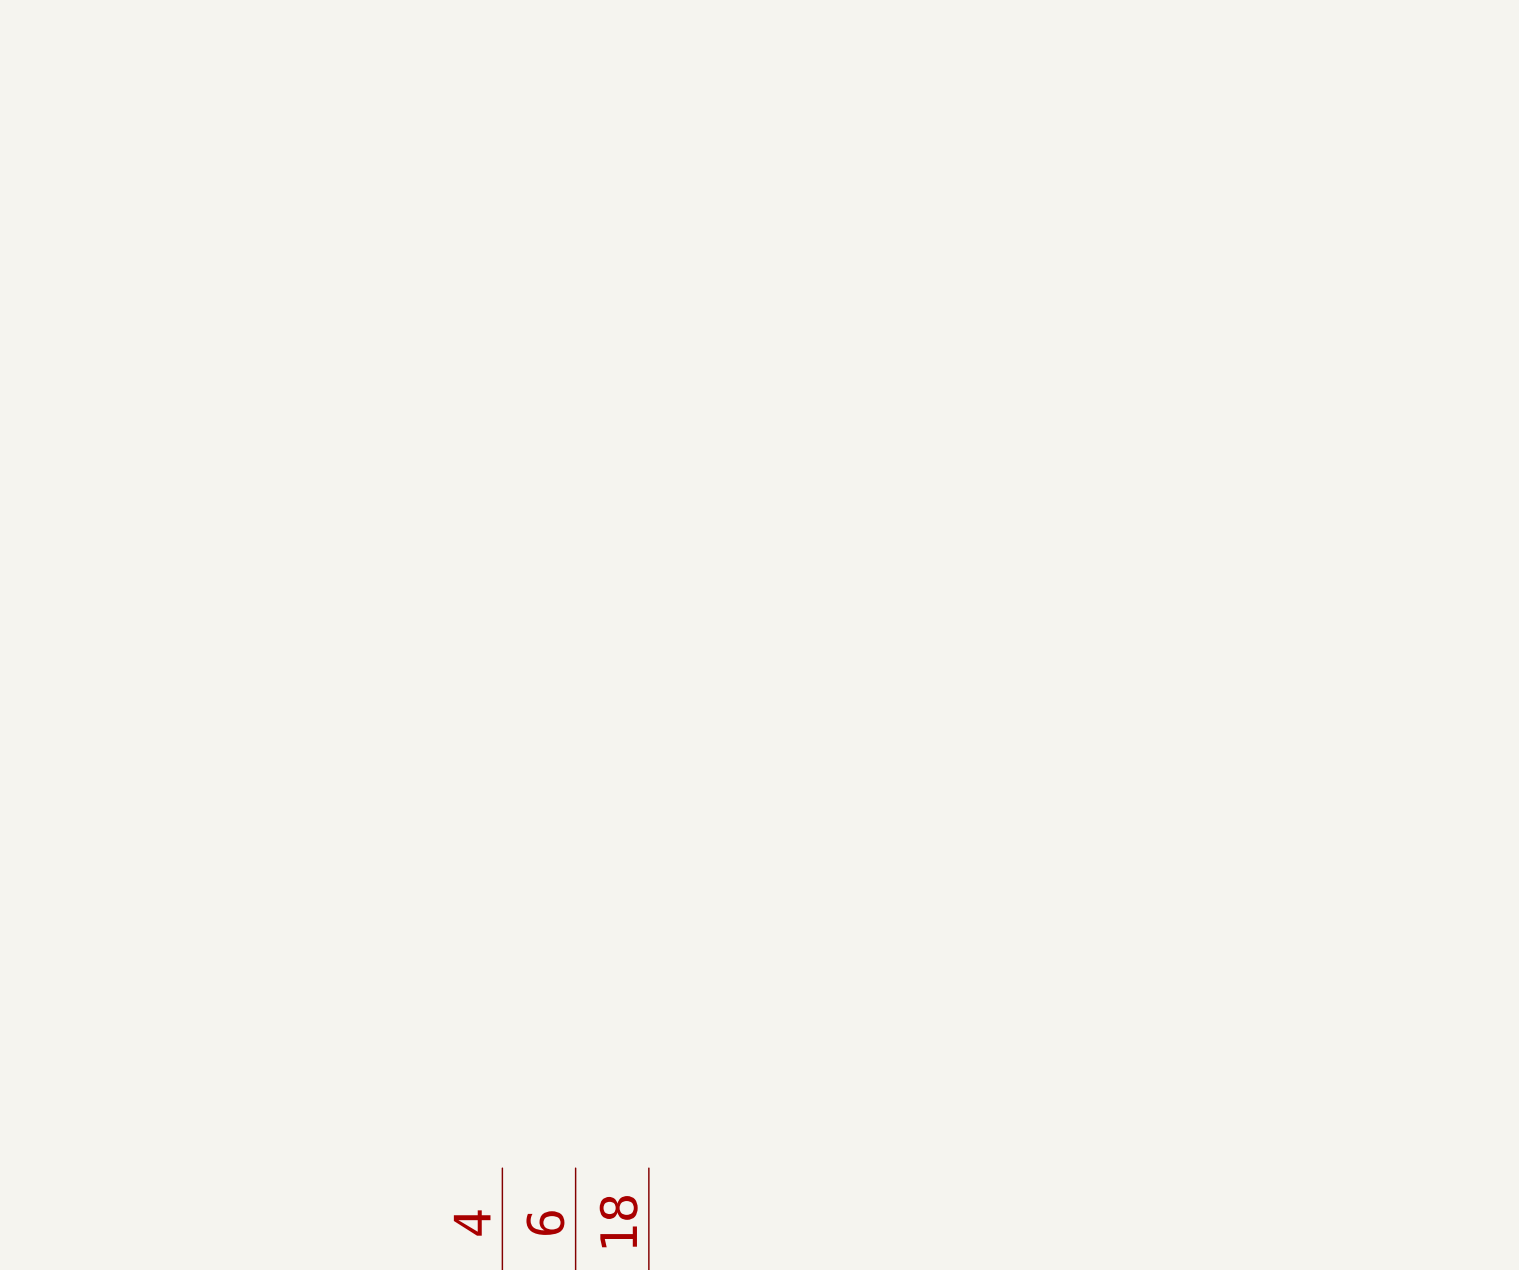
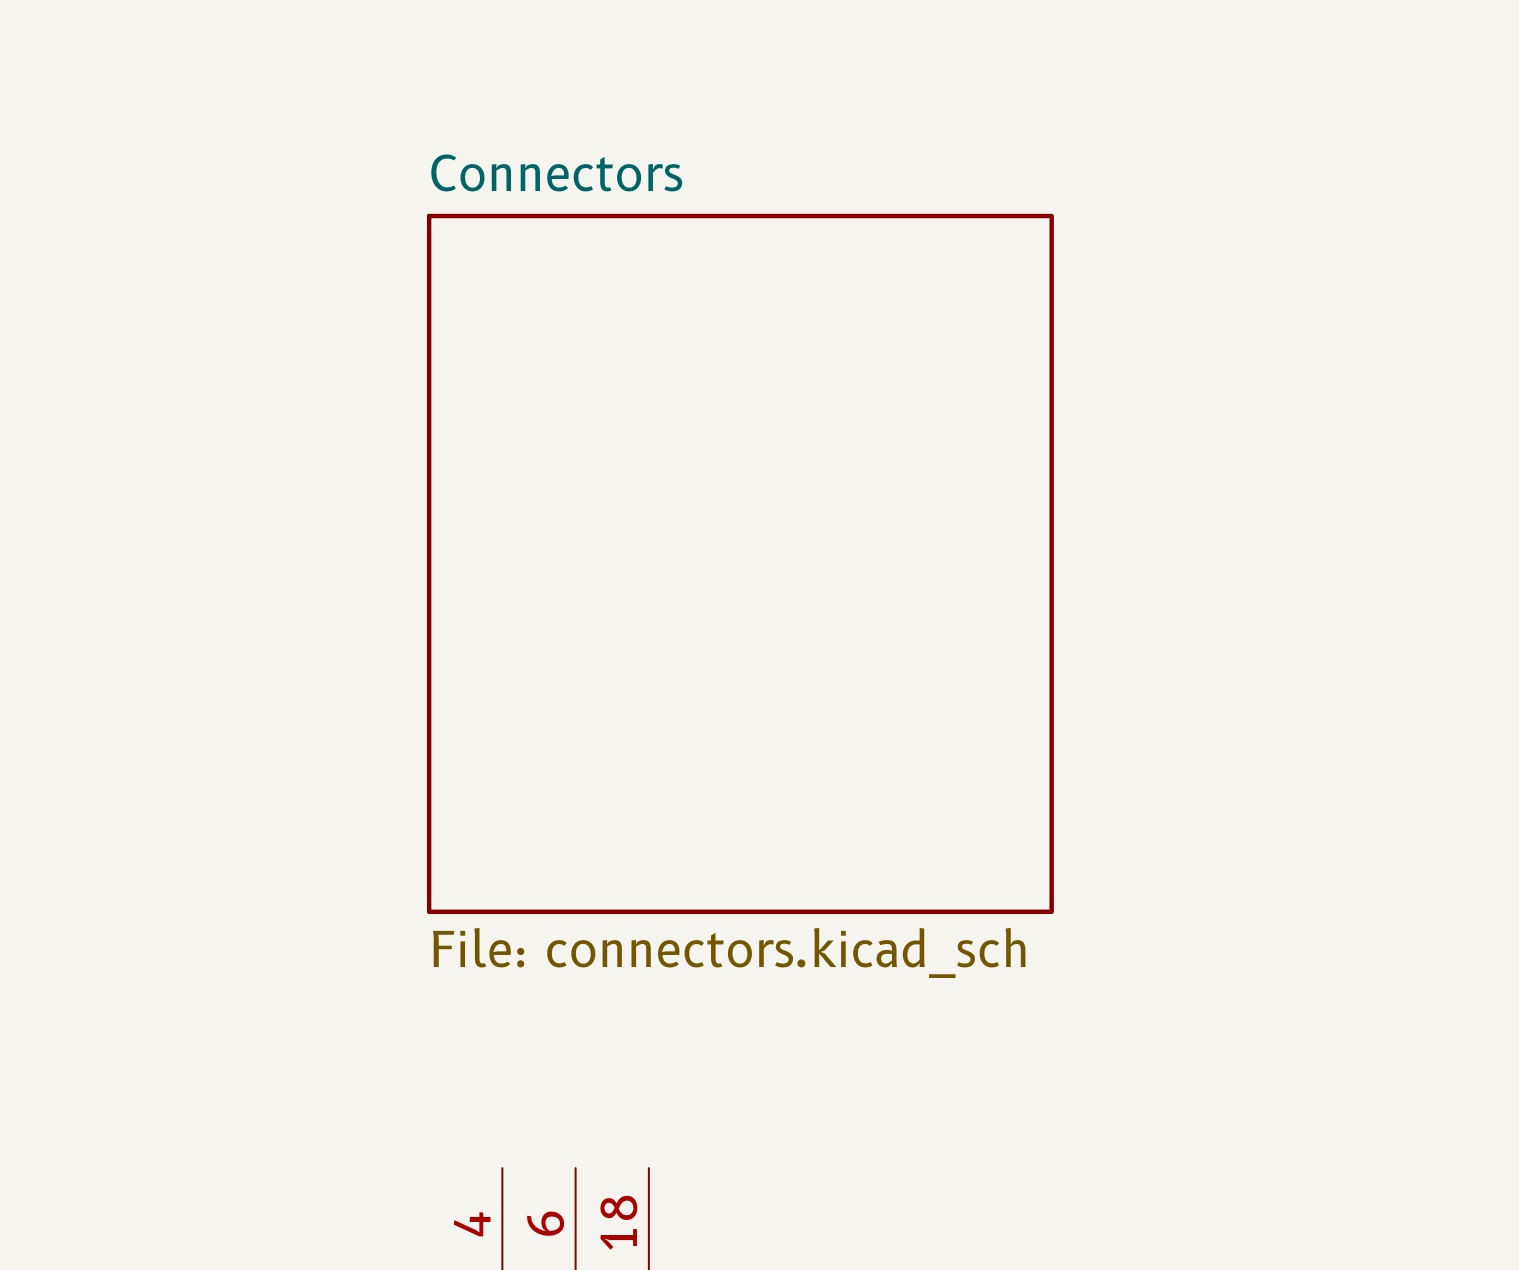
sheet Connectors: none -> File: connectors.kicad_sch (740, 563)

